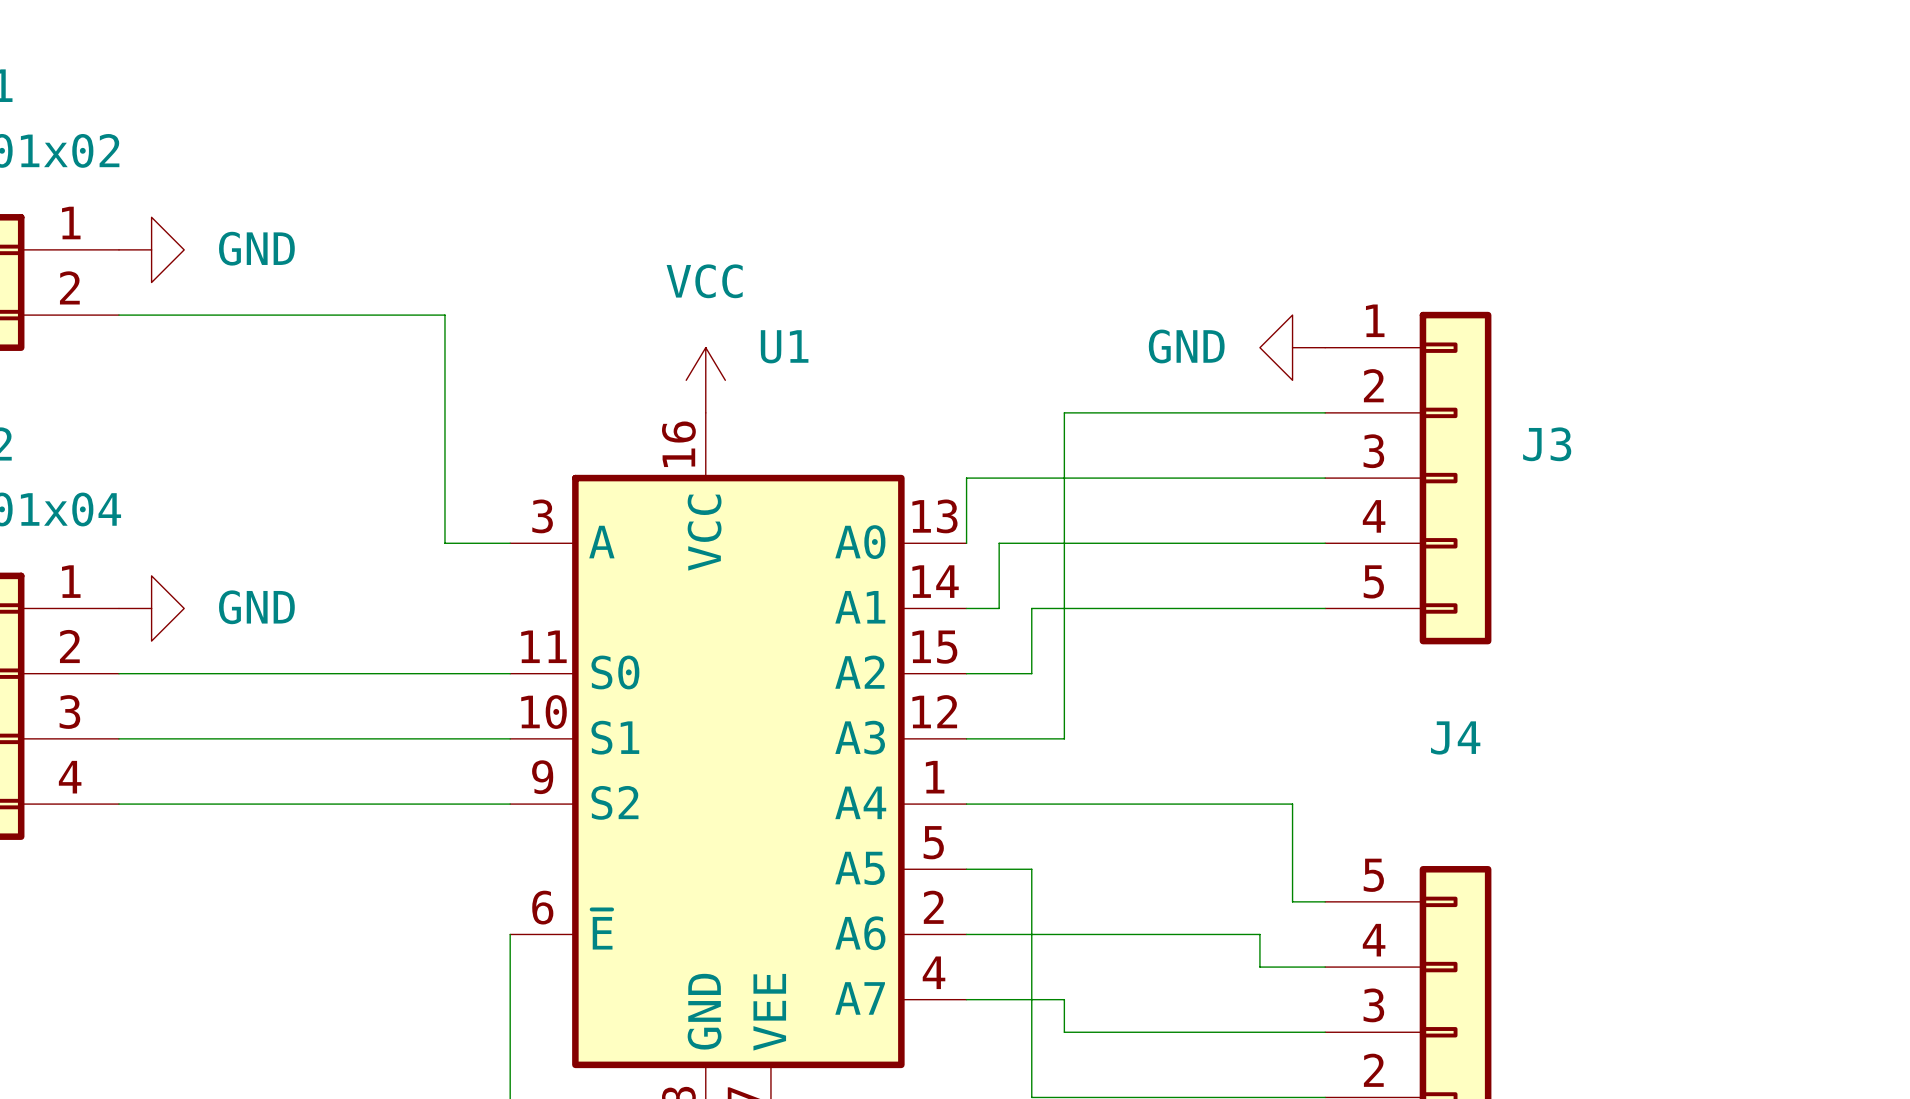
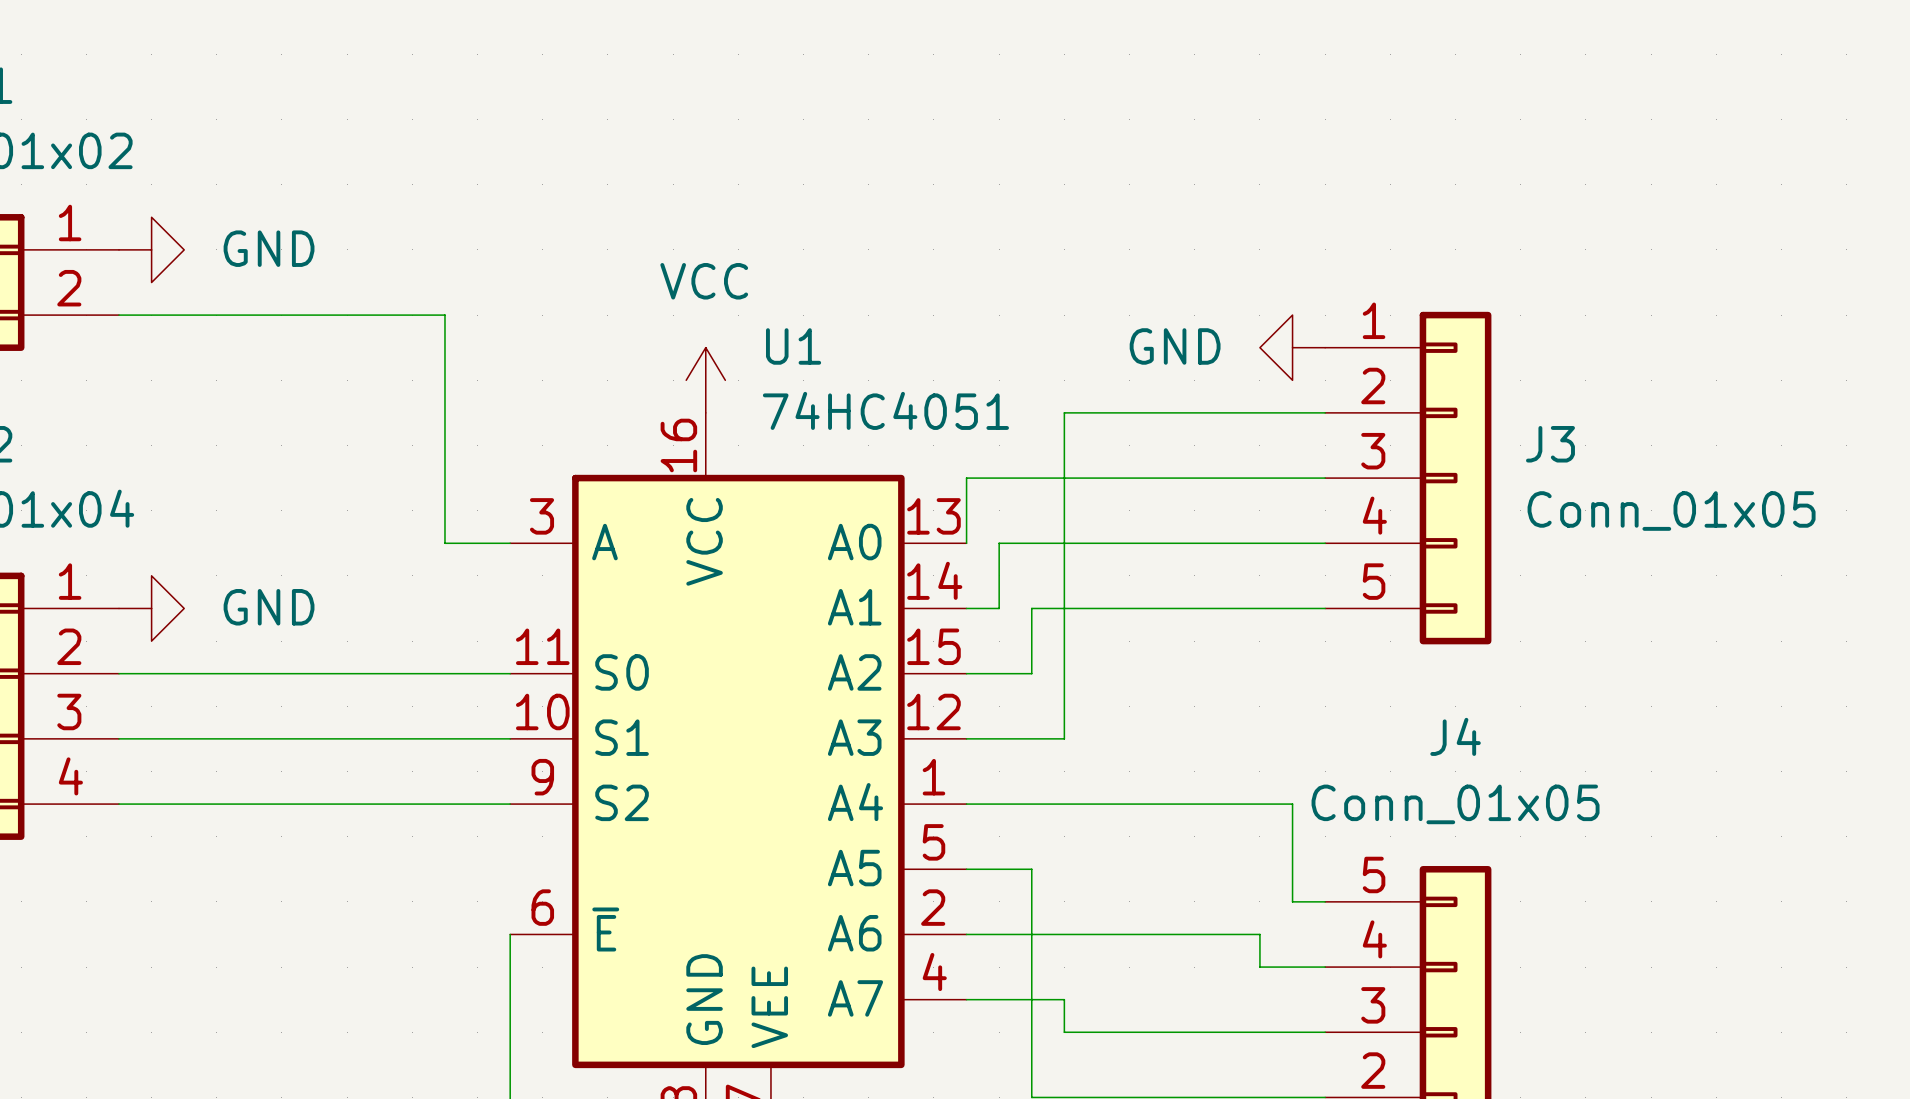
U1 value: none -> 74HC4051 (885, 410)
J3 value: none -> Conn_01x05 (1671, 511)
J4 value: none -> Conn_01x05 (1455, 804)

